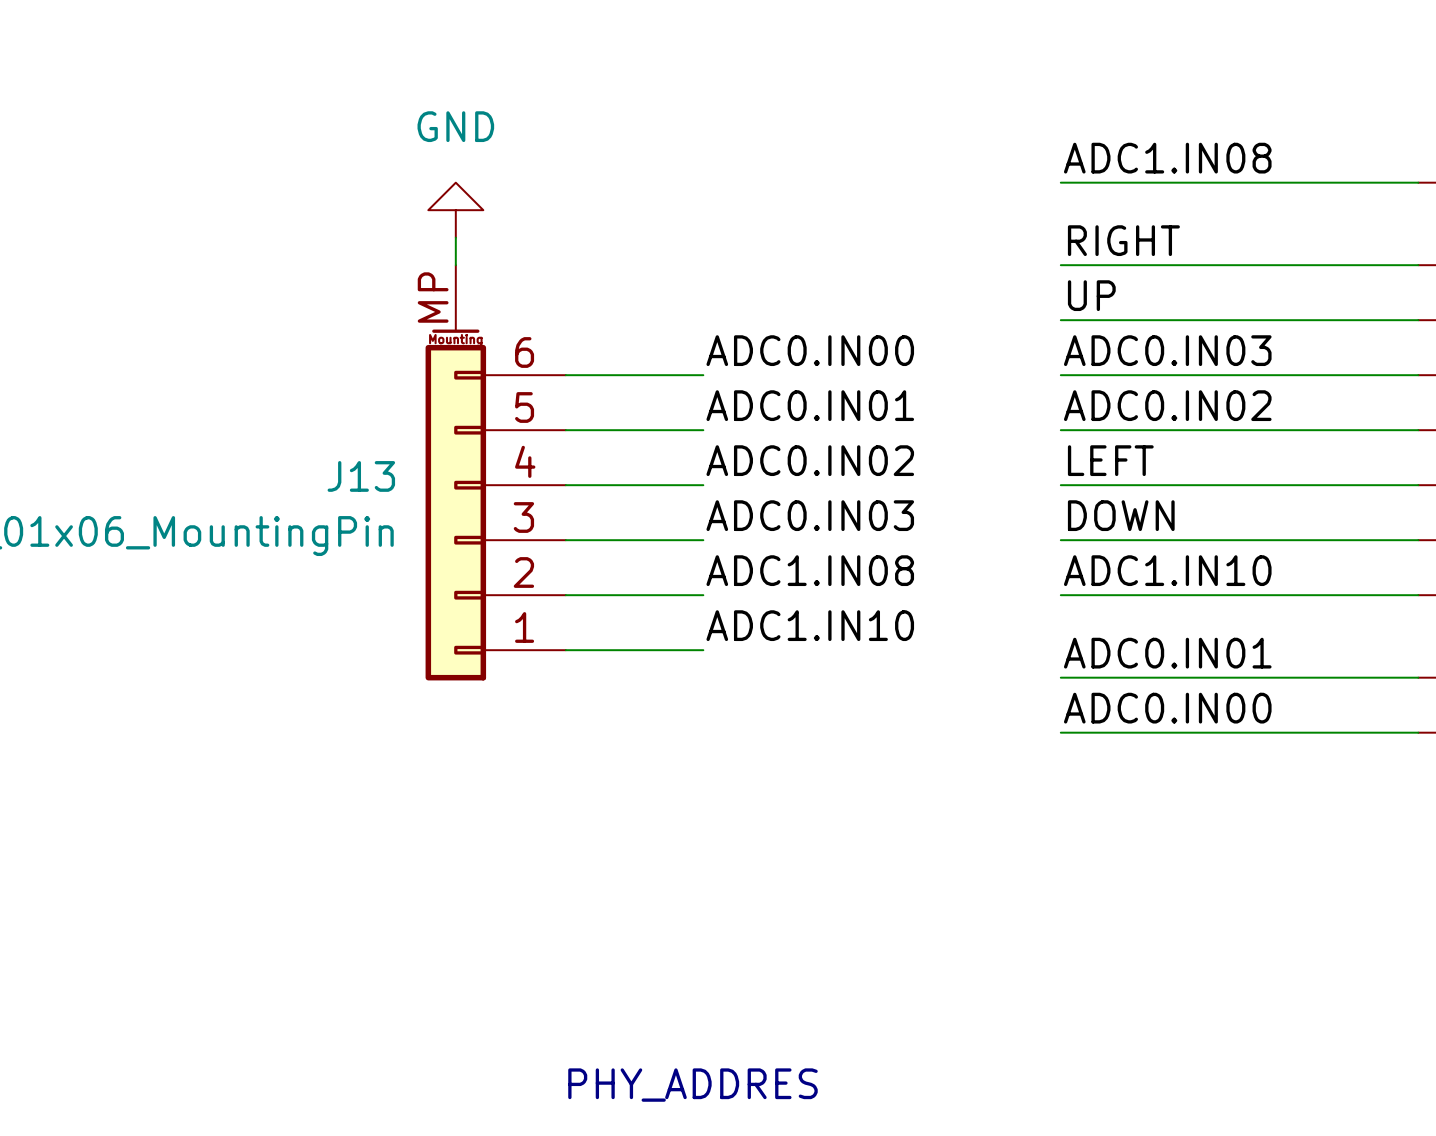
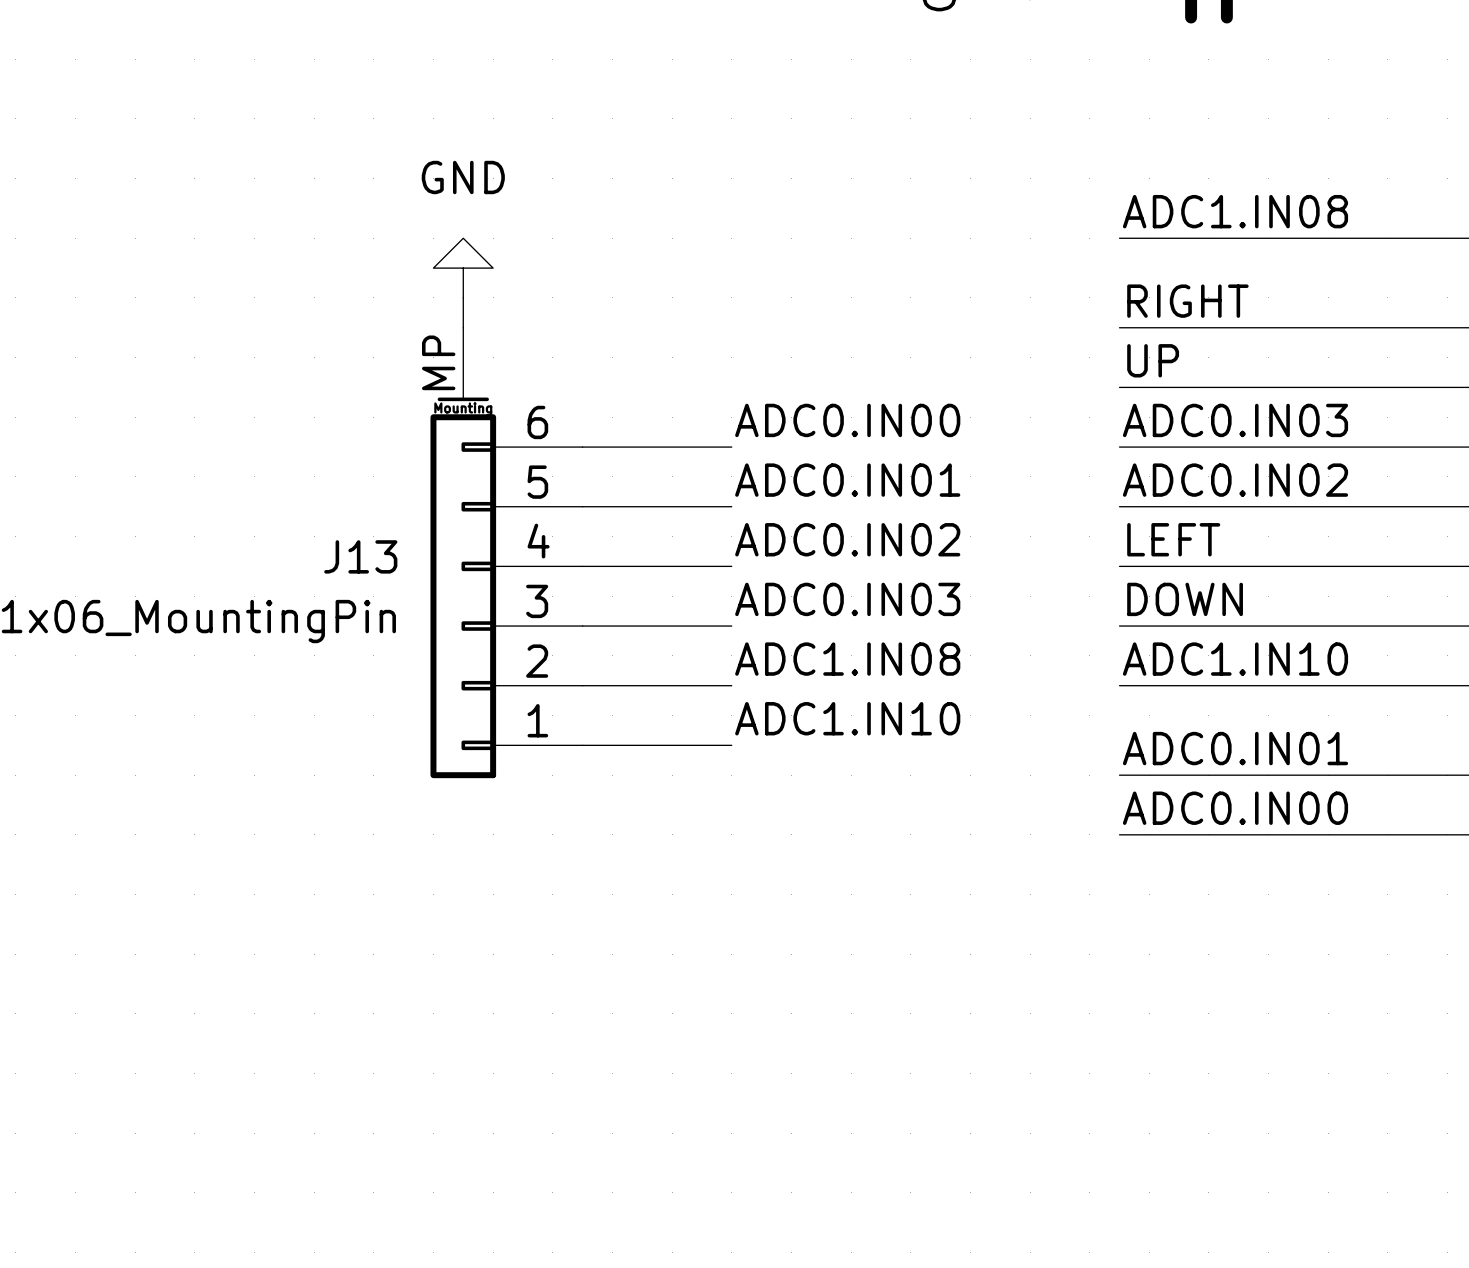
text: PHY_ADDRES (692, 1085) -> none

